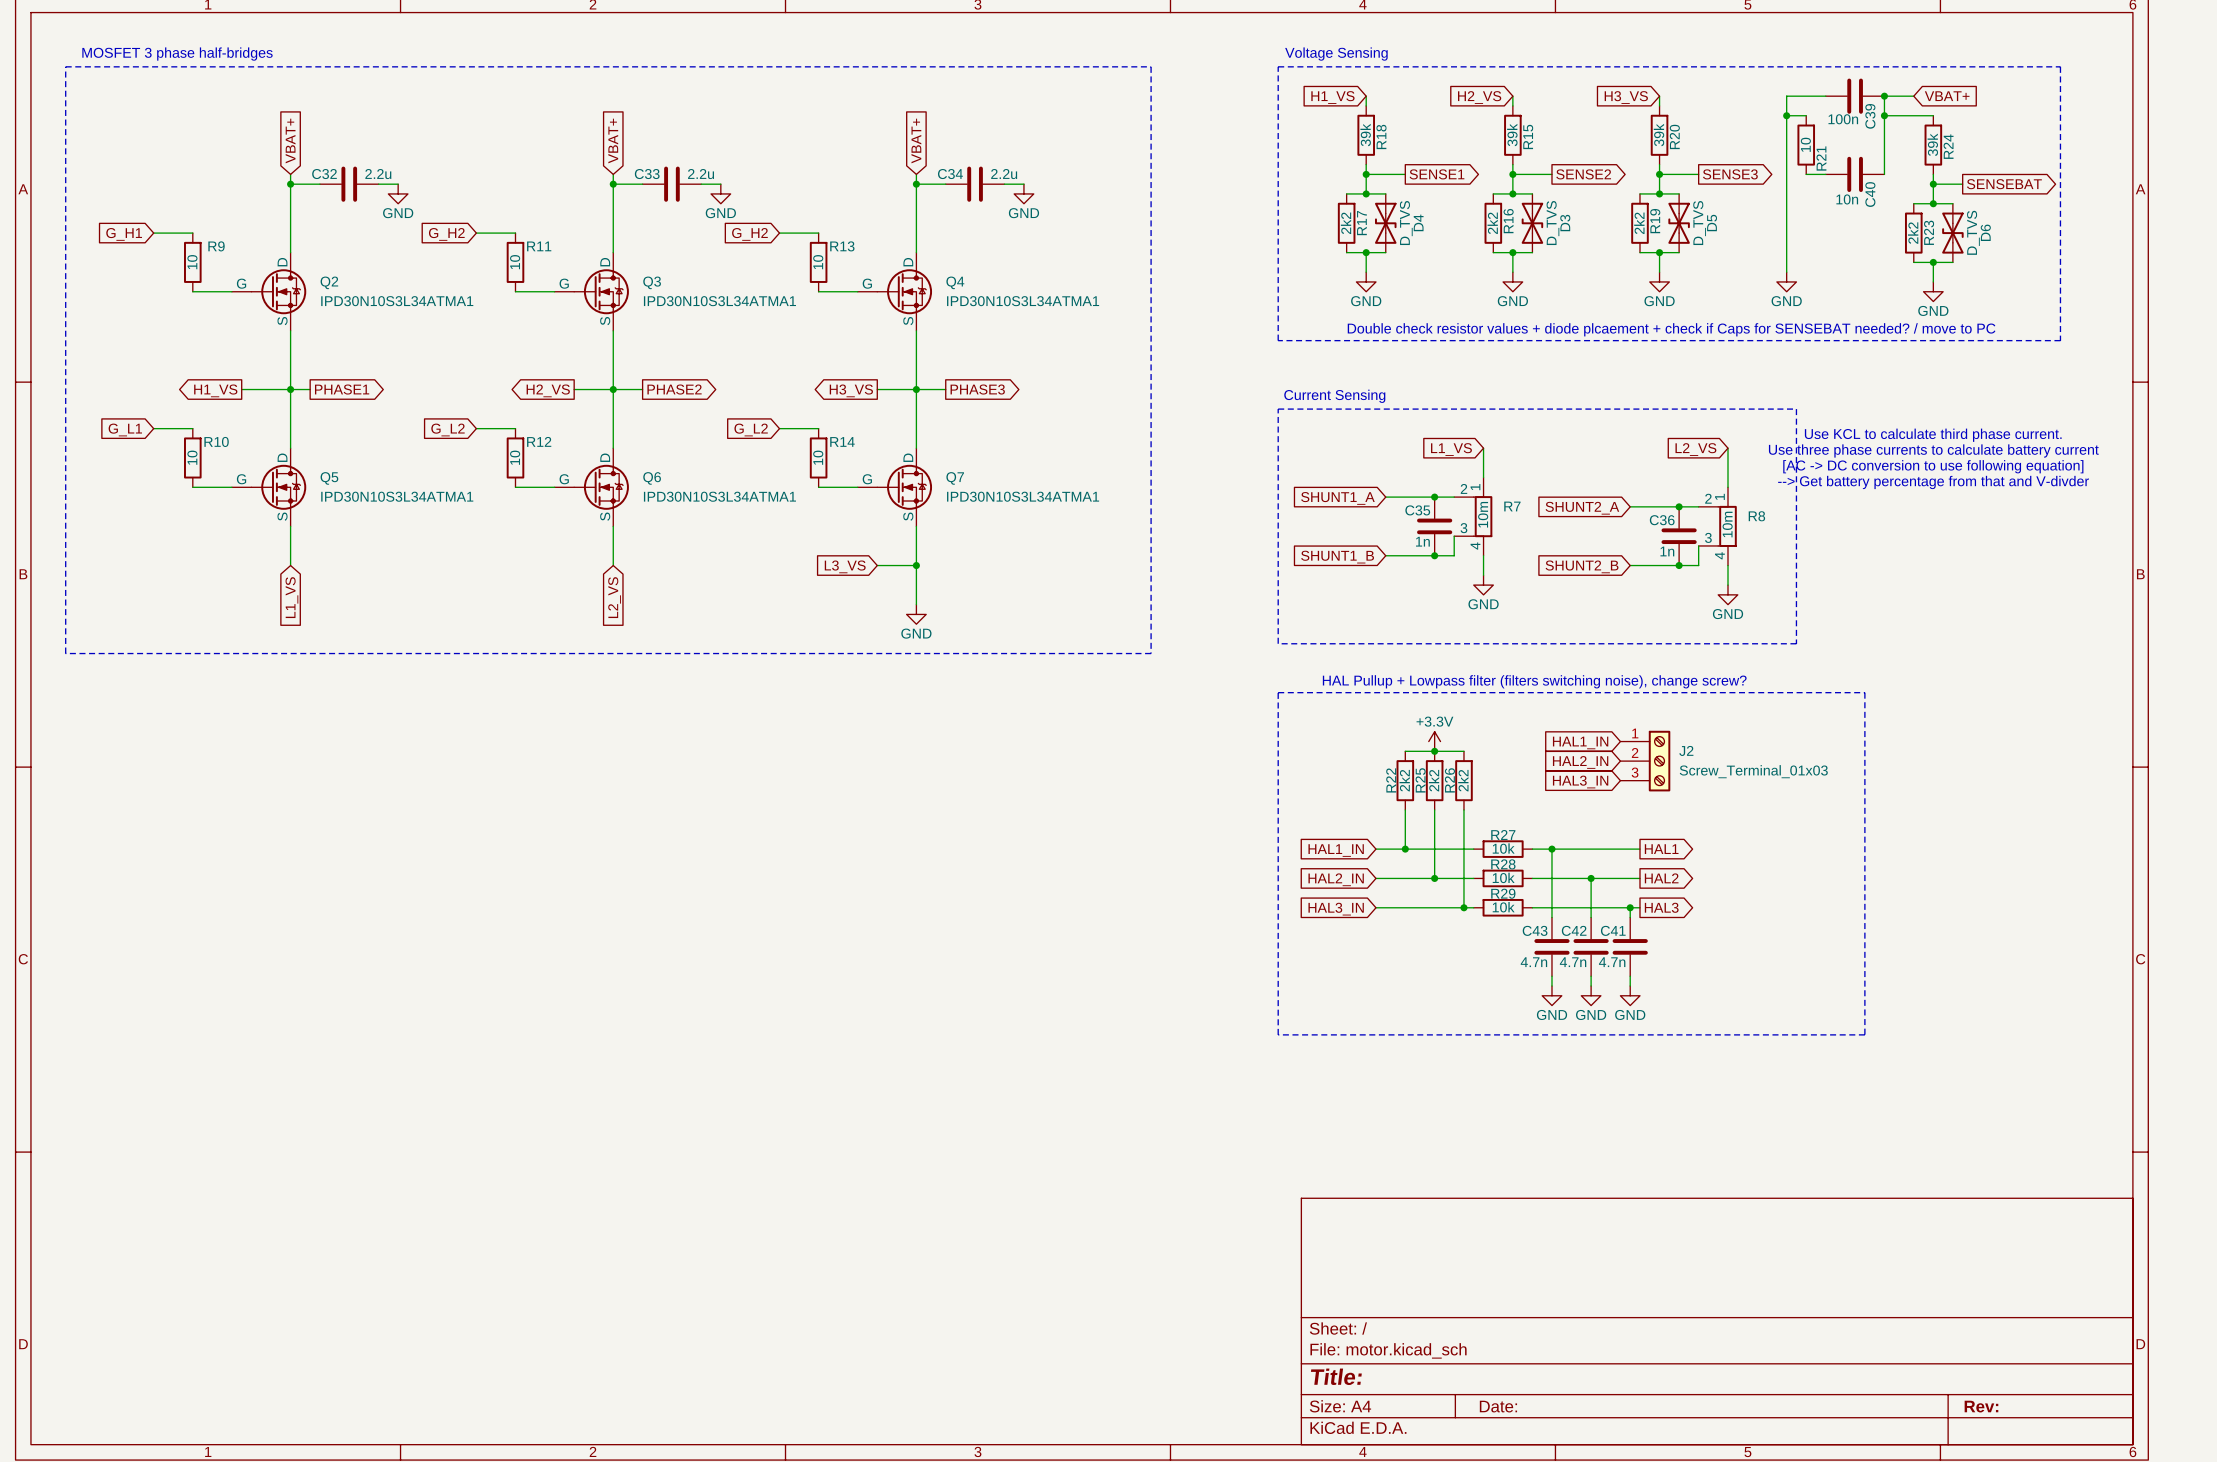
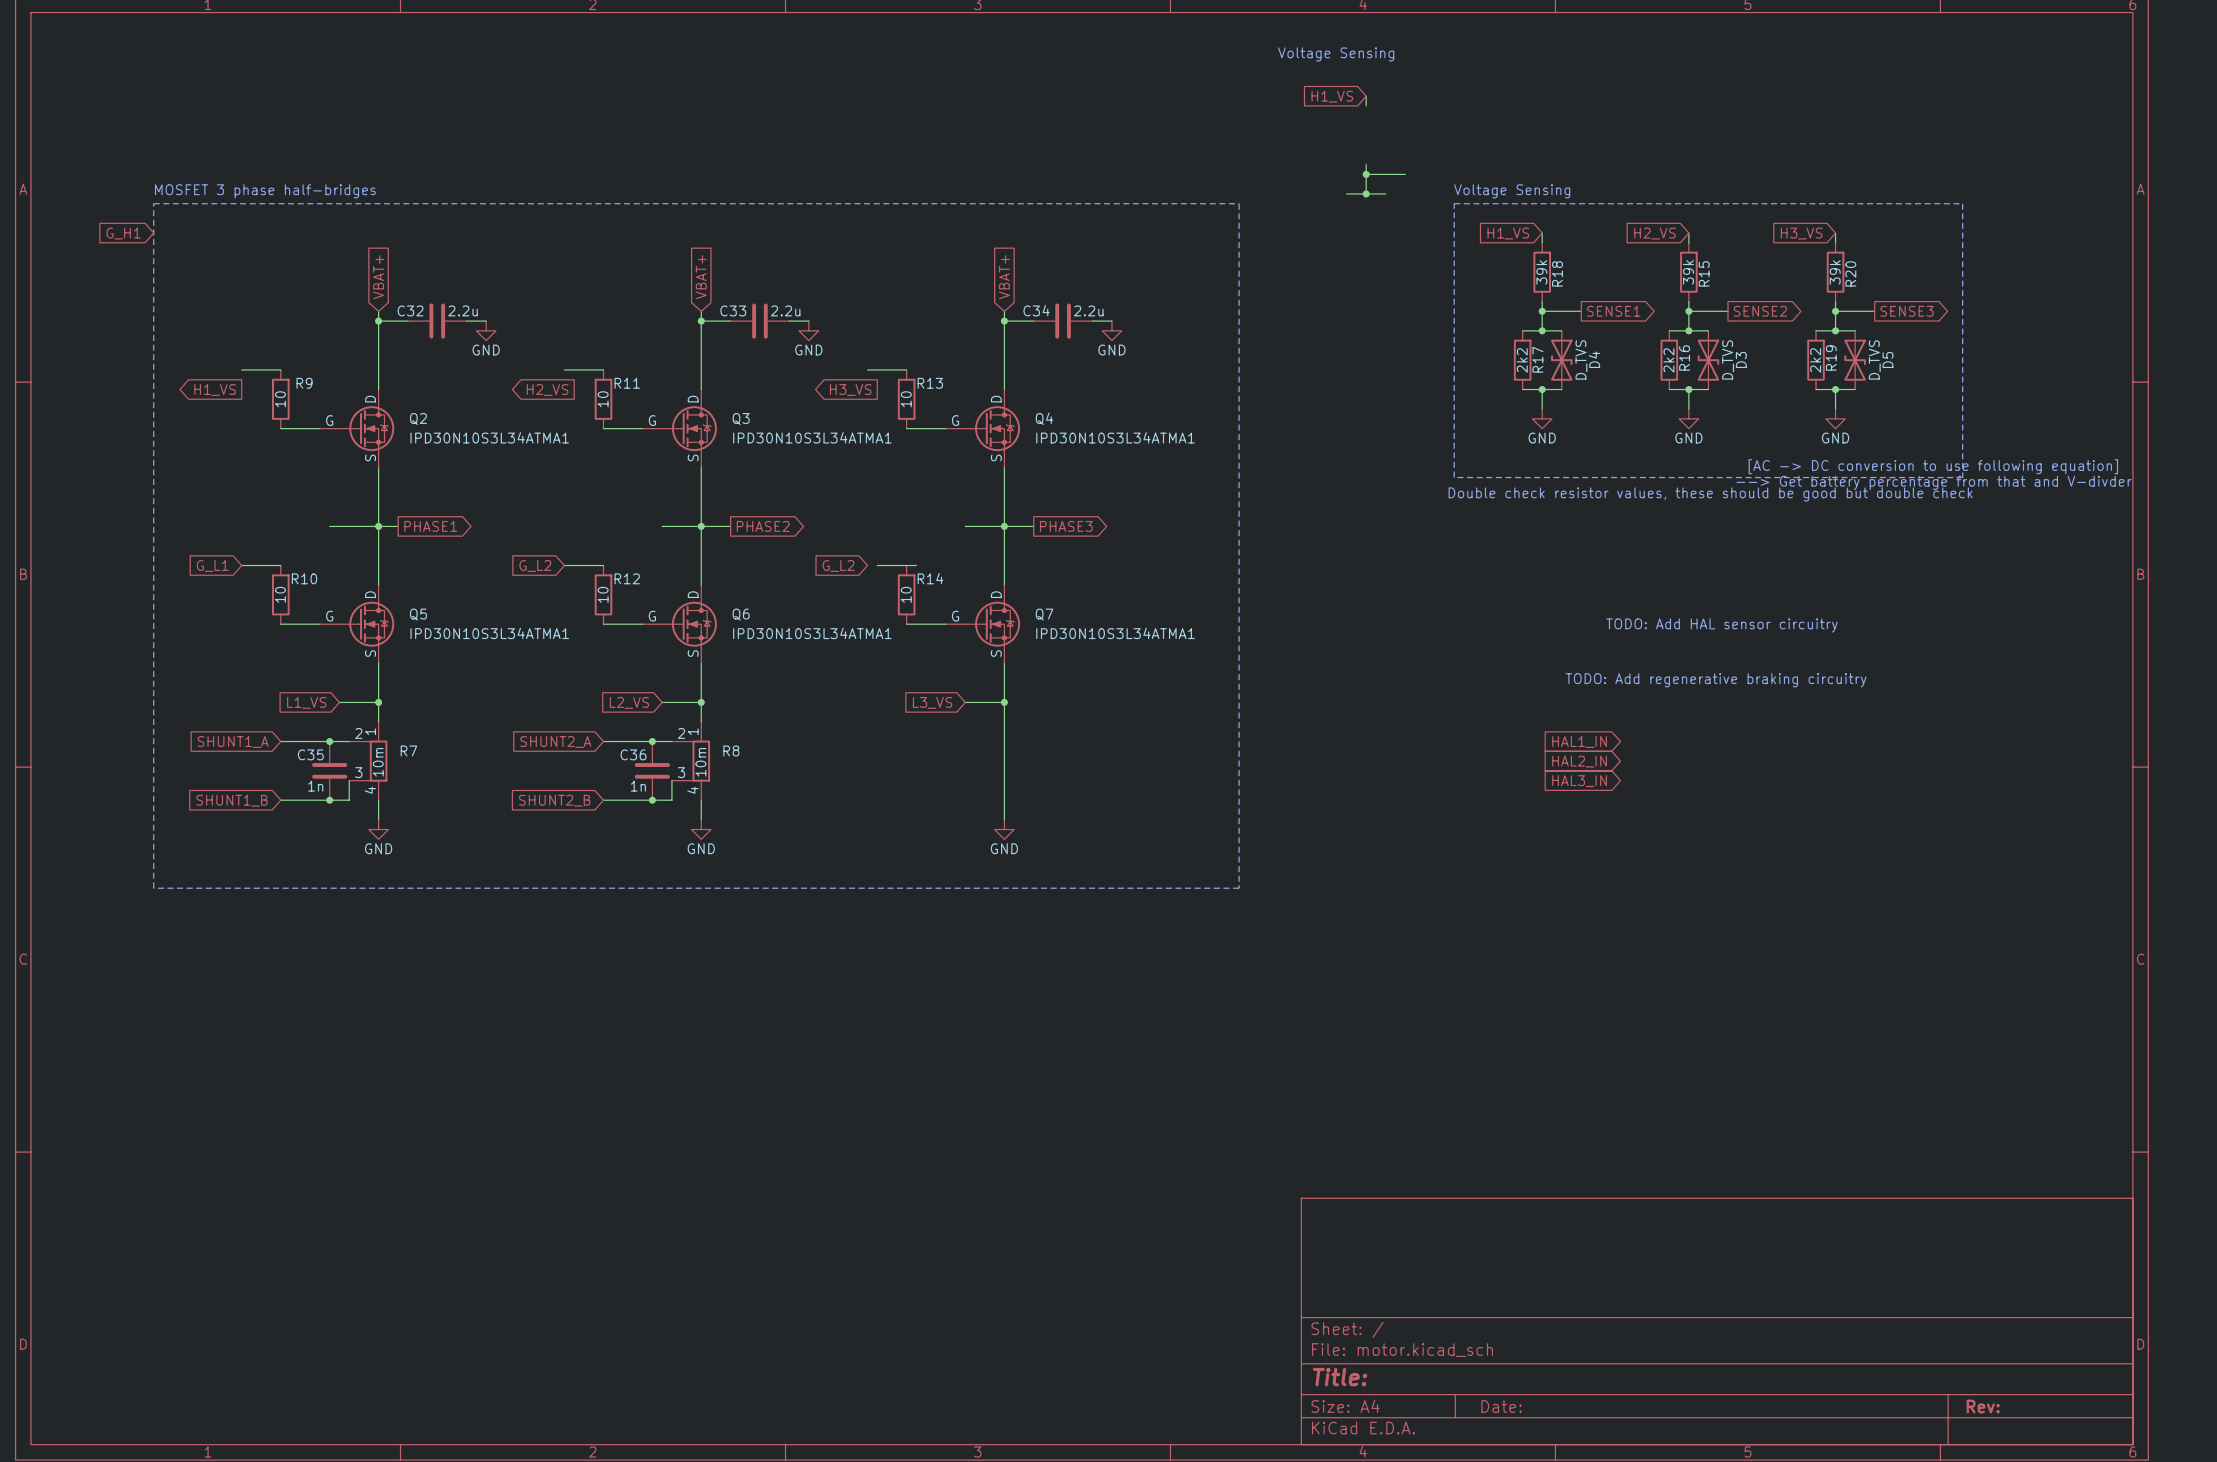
text position: MOSFET 3 phase half-bridges (177, 54) -> MOSFET 3 phase half-bridges (265, 191)
line: (65, 66) (1151, 66) (1151, 653) (65, 653) (65, 66) -> none
line: (1278, 66) (1278, 340) (2060, 340) (2060, 66) (1278, 66) -> none
wire: (1512, 96) (1512, 105) -> (1542, 233) (1542, 242)
wire: (1659, 96) (1659, 105) -> (1688, 233) (1688, 242)
wire: (1825, 96) (1786, 96) (1786, 272) -> none
C39: 100n (1855, 96) -> none
junction: (1884, 96) -> none
wire: (1913, 96) (1884, 96) (1884, 174) -> none
global label: VBAT+ (1947, 96) -> none
global label: H2_VS (1479, 97) -> none
global label: H3_VS (1626, 97) -> none
wire: (1786, 115) (1806, 115) -> none
junction: (1786, 115) -> none
wire: (1884, 115) (1933, 115) -> none
junction: (1884, 115) -> none
R18 position: (1366, 135) -> (1542, 272)
R15 position: (1512, 135) -> (1688, 272)
R20 position: (1659, 135) -> (1835, 272)
global label: VBAT+ (290, 141) -> none
global label: VBAT+ (613, 141) -> none
global label: VBAT+ (916, 141) -> none
R21: 10 (1806, 145) -> none
R24: 39k (1933, 145) -> none
wire: (1512, 164) (1512, 193) -> (1542, 301) (1542, 330)
wire: (1659, 164) (1659, 193) -> (1688, 301) (1688, 330)
wire: (290, 174) (290, 252) -> (378, 311) (378, 389)
wire: (613, 174) (613, 252) -> (701, 311) (701, 389)
wire: (916, 174) (916, 252) -> (1004, 311) (1004, 389)
global label: SENSE1 (1437, 174) -> none
wire: (1512, 174) (1551, 174) -> (1542, 311) (1581, 311)
junction: (1512, 174) -> none
global label: SENSE2 (1583, 174) -> none
wire: (1659, 174) (1698, 174) -> (1688, 311) (1727, 311)
junction: (1659, 174) -> none
global label: SENSE3 (1730, 174) -> none
wire: (1806, 174) (1825, 174) -> none
C40: 10n (1855, 174) -> none
wire: (1933, 174) (1933, 203) -> (1835, 301) (1835, 330)
wire: (290, 184) (319, 184) -> (378, 321) (407, 321)
junction: (290, 184) -> none
C32 position: (349, 184) -> (437, 321)
wire: (378, 184) (398, 184) -> (466, 321) (486, 321)
wire: (613, 184) (642, 184) -> (701, 321) (730, 321)
junction: (613, 184) -> none
C33 position: (671, 184) -> (759, 321)
wire: (701, 184) (720, 184) -> (789, 321) (808, 321)
wire: (916, 184) (945, 184) -> (1004, 321) (1033, 321)
junction: (916, 184) -> none
C34 position: (975, 184) -> (1063, 321)
wire: (1004, 184) (1023, 184) -> (1092, 321) (1111, 321)
wire: (1933, 184) (1962, 184) -> none
junction: (1933, 184) -> none
global label: SENSEBAT (2004, 184) -> none
text: none -> Voltage Sensing (1512, 191)
power symbol: GND (398, 193) -> none
power symbol: GND (720, 193) -> none
power symbol: GND (1023, 193) -> none
junction: (1512, 193) -> none
wire: (1639, 193) (1679, 193) -> (1669, 330) (1708, 330)
junction: (1659, 193) -> none
line: none -> (153, 203) (1239, 203) (1239, 888) (153, 888) (153, 203)
line: none -> (1454, 203) (1962, 203) (1962, 477) (1454, 477) (1454, 203)
junction: (1933, 203) -> none
R17 position: (1346, 223) -> (1522, 360)
D4 position: (1385, 223) -> (1561, 360)
R16 position: (1493, 223) -> (1669, 360)
D3 position: (1532, 223) -> (1708, 360)
R19 position: (1639, 223) -> (1816, 360)
D5 position: (1679, 223) -> (1855, 360)
wire: (153, 233) (192, 233) -> (241, 369) (280, 369)
wire: (476, 233) (515, 233) -> (564, 369) (603, 369)
wire: (779, 233) (818, 233) -> (867, 369) (906, 369)
wire: none -> (1835, 233) (1835, 242)
R23: 2k2 (1913, 233) -> none
D6: D_TVS (1952, 233) -> none
global label: G_H2 (446, 234) -> none
global label: G_H2 (749, 234) -> none
global label: none -> H1_VS (1508, 233)
global label: none -> H2_VS (1654, 233)
global label: none -> H3_VS (1801, 233)
wire: (1346, 252) (1385, 252) -> none
wire: (1366, 252) (1366, 272) -> none
junction: (1366, 252) -> none
wire: (1493, 252) (1532, 252) -> (1522, 389) (1561, 389)
wire: (1512, 252) (1512, 272) -> (1542, 389) (1542, 409)
junction: (1512, 252) -> none
wire: (1639, 252) (1679, 252) -> (1669, 389) (1708, 389)
wire: (1659, 252) (1659, 272) -> (1688, 389) (1688, 409)
junction: (1659, 252) -> none
R9 position: (192, 262) -> (280, 399)
R11 position: (515, 262) -> (603, 399)
R13 position: (818, 262) -> (906, 399)
wire: (1913, 262) (1952, 262) -> (1816, 389) (1855, 389)
wire: (1933, 262) (1933, 281) -> (1835, 389) (1835, 409)
junction: (1933, 262) -> none
global label: none -> VBAT+ (378, 277)
global label: none -> VBAT+ (701, 277)
global label: none -> VBAT+ (1004, 277)
power symbol: GND (1366, 281) -> none
power symbol: GND (1512, 281) -> none
power symbol: GND (1659, 281) -> none
power symbol: GND (1786, 281) -> none
wire: (192, 291) (231, 291) -> (280, 428) (319, 428)
Q2 position: (269, 291) -> (357, 428)
wire: (515, 291) (554, 291) -> (603, 428) (642, 428)
Q3 position: (591, 291) -> (679, 428)
wire: (818, 291) (857, 291) -> (906, 428) (945, 428)
Q4 position: (894, 291) -> (982, 428)
power symbol: GND (1933, 291) -> none
junction: none -> (1542, 311)
global label: none -> SENSE1 (1613, 311)
junction: none -> (1688, 311)
global label: none -> SENSE2 (1760, 311)
wire: none -> (1835, 311) (1874, 311)
junction: none -> (1835, 311)
global label: none -> SENSE3 (1907, 311)
junction: none -> (378, 321)
junction: none -> (701, 321)
junction: none -> (1004, 321)
text: Double check resistor values + diode plcaement + check if Caps for SENSEBAT needed? / move to PC (1671, 329) -> none
wire: (290, 330) (290, 448) -> (378, 467) (378, 585)
power symbol: none -> GND (486, 330)
wire: (613, 330) (613, 448) -> (701, 467) (701, 585)
power symbol: none -> GND (808, 330)
wire: (916, 330) (916, 448) -> (1004, 467) (1004, 585)
power symbol: none -> GND (1111, 330)
junction: none -> (1542, 330)
junction: none -> (1688, 330)
junction: none -> (1835, 330)
wire: (241, 389) (310, 389) -> (329, 526) (398, 526)
junction: (290, 389) -> none
global label position: PHASE1 (342, 389) -> PHASE1 (430, 526)
wire: (574, 389) (642, 389) -> (662, 526) (730, 526)
junction: (613, 389) -> none
global label position: PHASE2 (674, 389) -> PHASE2 (763, 526)
wire: (877, 389) (945, 389) -> (965, 526) (1033, 526)
junction: (916, 389) -> none
global label position: PHASE3 (977, 389) -> PHASE3 (1066, 526)
junction: none -> (1542, 389)
junction: none -> (1688, 389)
junction: none -> (1835, 389)
text: Current Sensing (1334, 396) -> none
line: (1278, 409) (1796, 409) (1796, 643) (1278, 643) (1278, 409) -> none
power symbol: none -> GND (1542, 418)
power symbol: none -> GND (1688, 418)
power symbol: none -> GND (1835, 418)
wire: (153, 428) (192, 428) -> (241, 565) (280, 565)
wire: (476, 428) (515, 428) -> (564, 565) (603, 565)
wire: (779, 428) (818, 428) -> none
global label position: G_L1 (125, 429) -> G_L1 (212, 566)
global label: G_L2 (447, 429) -> none
global label: G_L2 (751, 429) -> none
text: Use KCL to calculate third phase current. (1933, 435) -> none
wire: (1483, 448) (1483, 477) -> none
wire: (1727, 448) (1727, 487) -> none
global label: L1_VS (1451, 449) -> none
global label: L2_VS (1695, 449) -> none
text: Use three phase currents to calculate battery current (1933, 450) -> none
R10 position: (192, 457) -> (280, 594)
R12 position: (515, 457) -> (603, 594)
R14 position: (818, 457) -> (906, 594)
wire: (192, 487) (231, 487) -> (280, 624) (319, 624)
Q5 position: (269, 487) -> (357, 624)
wire: (515, 487) (554, 487) -> (603, 624) (642, 624)
Q6 position: (591, 487) -> (679, 624)
wire: (818, 487) (857, 487) -> (906, 624) (945, 624)
Q7 position: (894, 487) -> (982, 624)
text: none -> Double check resistor values, these should be good but double check (1710, 494)
wire: (1385, 497) (1454, 497) -> none
junction: (1434, 497) -> none
global label: SHUNT1_A (1337, 498) -> none
wire: (1630, 506) (1698, 506) -> none
junction: (1679, 506) -> none
global label: SHUNT2_A (1582, 508) -> none
R7 position: (1473, 516) -> (368, 761)
wire: (290, 526) (290, 565) -> none
junction: none -> (378, 526)
wire: (613, 526) (613, 565) -> none
junction: none -> (701, 526)
wire: (916, 526) (916, 604) -> none
junction: none -> (1004, 526)
C35 position: (1434, 526) -> (329, 770)
R8 position: (1717, 526) -> (691, 761)
wire: (1454, 536) (1454, 555) (1385, 555) -> none
C36 position: (1679, 536) -> (652, 770)
wire: (1698, 545) (1698, 565) (1630, 565) -> none
junction: (1434, 555) -> none
wire: (1483, 555) (1483, 575) -> none
global label: SHUNT1_B (1337, 557) -> none
junction: (916, 565) -> none
junction: (1679, 565) -> none
wire: (1727, 565) (1727, 585) -> none
global label: none -> G_L2 (535, 566)
global label: none -> G_L2 (838, 566)
global label position: L3_VS (845, 566) -> L3_VS (932, 702)
global label: SHUNT2_B (1582, 566) -> none
power symbol: GND (1483, 585) -> none
power symbol: GND (1727, 594) -> none
global label rotation: 0° (291, 597) -> 90° clockwise (306, 702)
global label position: L1_VS (291, 597) -> L1_VS (306, 702)
global label rotation: 0° (614, 597) -> 90° clockwise (629, 702)
global label position: L2_VS (614, 597) -> L2_VS (629, 702)
power symbol: GND (916, 614) -> none
text: none -> TODO: Add HAL sensor circuitry (1721, 625)
wire: none -> (378, 663) (378, 721)
wire: none -> (701, 663) (701, 721)
wire: none -> (1004, 663) (1004, 819)
text: none -> TODO: Add regenerative braking circuitry (1716, 680)
text: HAL Pullup + Lowpass filter (filters switching noise), change screw? (1534, 681) -> none
line: (1278, 692) (1278, 1034) (1864, 1034) (1864, 692) (1278, 692) -> none
wire: none -> (339, 702) (378, 702)
junction: none -> (378, 702)
wire: none -> (662, 702) (701, 702)
junction: none -> (701, 702)
wire: none -> (965, 702) (1004, 702)
junction: none -> (1004, 702)
wire: none -> (280, 741) (349, 741)
junction: none -> (329, 741)
wire: none -> (603, 741) (671, 741)
junction: none -> (652, 741)
power symbol: +3.3V (1434, 741) -> none
global label: none -> SHUNT1_A (233, 742)
global label: none -> SHUNT2_A (555, 742)
wire: (1405, 751) (1463, 751) -> none
junction: (1434, 751) -> none
J2: Screw_Terminal_01x03 (1645, 761) -> none
wire: none -> (349, 780) (349, 800) (280, 800)
wire: none -> (671, 780) (671, 800) (603, 800)
R22: 2k2 (1405, 780) -> none
R25: 2k2 (1434, 780) -> none
R26: 2k2 (1463, 780) -> none
junction: none -> (329, 800)
wire: none -> (378, 800) (378, 819)
junction: none -> (652, 800)
wire: none -> (701, 800) (701, 819)
global label: none -> SHUNT1_B (232, 800)
global label: none -> SHUNT2_B (554, 800)
wire: (1405, 809) (1405, 849) -> none
wire: (1434, 809) (1434, 878) -> none
wire: (1463, 809) (1463, 907) -> none
power symbol: none -> GND (378, 829)
power symbol: none -> GND (701, 829)
power symbol: none -> GND (1004, 829)
wire: (1375, 849) (1473, 849) -> none
junction: (1405, 849) -> none
R27: 10k (1503, 849) -> none
wire: (1532, 849) (1639, 849) -> none
wire: (1551, 849) (1551, 917) -> none
junction: (1551, 849) -> none
global label: HAL1 (1661, 849) -> none
global label: HAL1_IN (1336, 850) -> none
wire: (1375, 878) (1473, 878) -> none
junction: (1434, 878) -> none
R28: 10k (1503, 878) -> none
wire: (1532, 878) (1639, 878) -> none
wire: (1591, 878) (1591, 917) -> none
junction: (1591, 878) -> none
global label: HAL2 (1661, 878) -> none
global label: HAL2_IN (1336, 879) -> none
wire: (1375, 907) (1473, 907) -> none
junction: (1463, 907) -> none
R29: 10k (1503, 907) -> none
wire: (1532, 907) (1639, 907) -> none
wire: (1630, 907) (1630, 917) -> none
junction: (1630, 907) -> none
global label: HAL3 (1661, 907) -> none
global label: HAL3_IN (1336, 909) -> none
C43: 4.7n (1551, 946) -> none
C42: 4.7n (1591, 946) -> none
C41: 4.7n (1630, 946) -> none
wire: (1551, 976) (1551, 986) -> none
wire: (1591, 976) (1591, 986) -> none
wire: (1630, 976) (1630, 986) -> none
power symbol: GND (1551, 995) -> none
power symbol: GND (1591, 995) -> none
power symbol: GND (1630, 995) -> none

